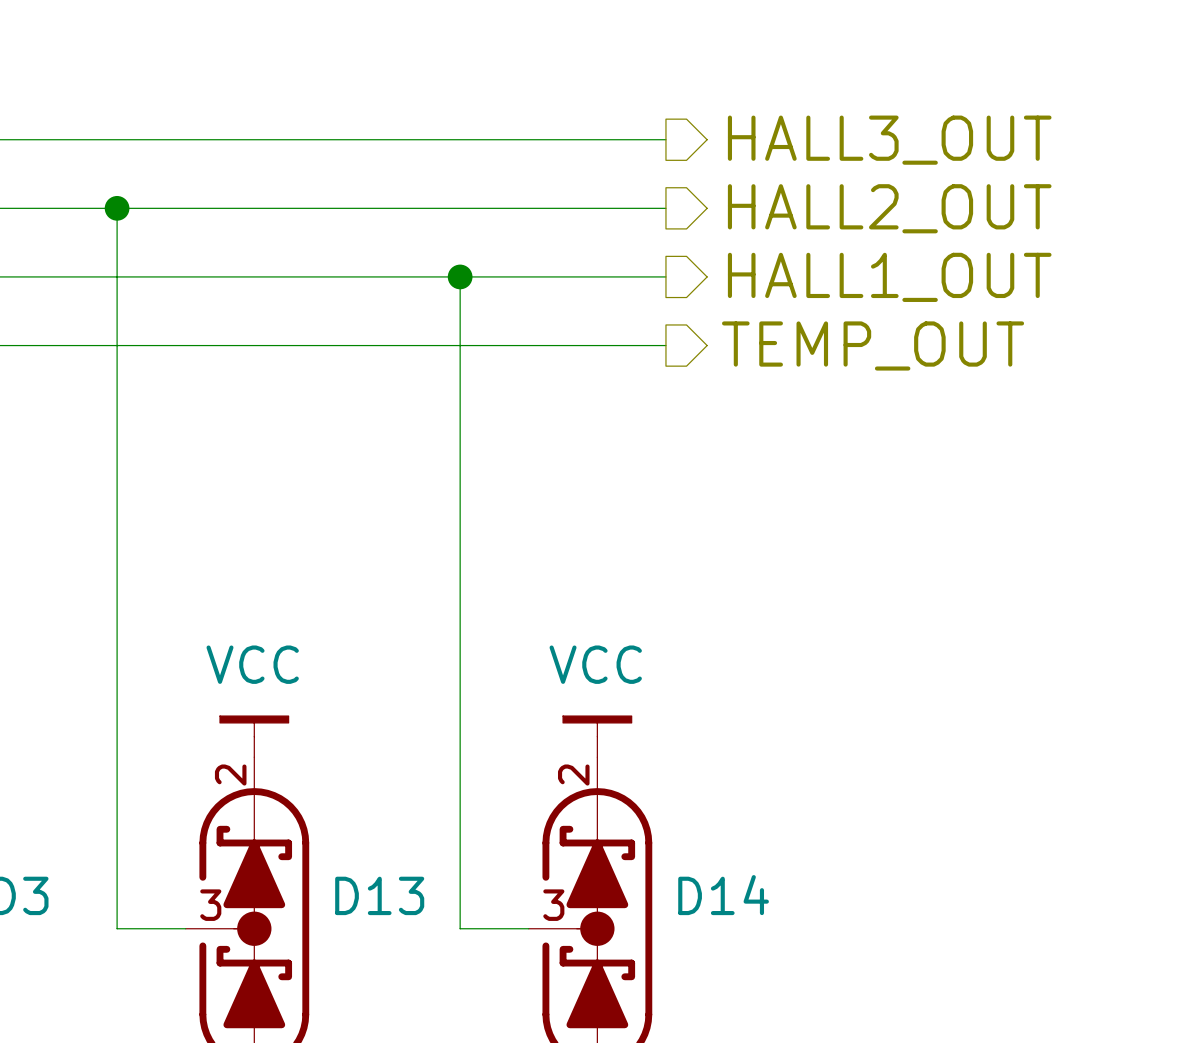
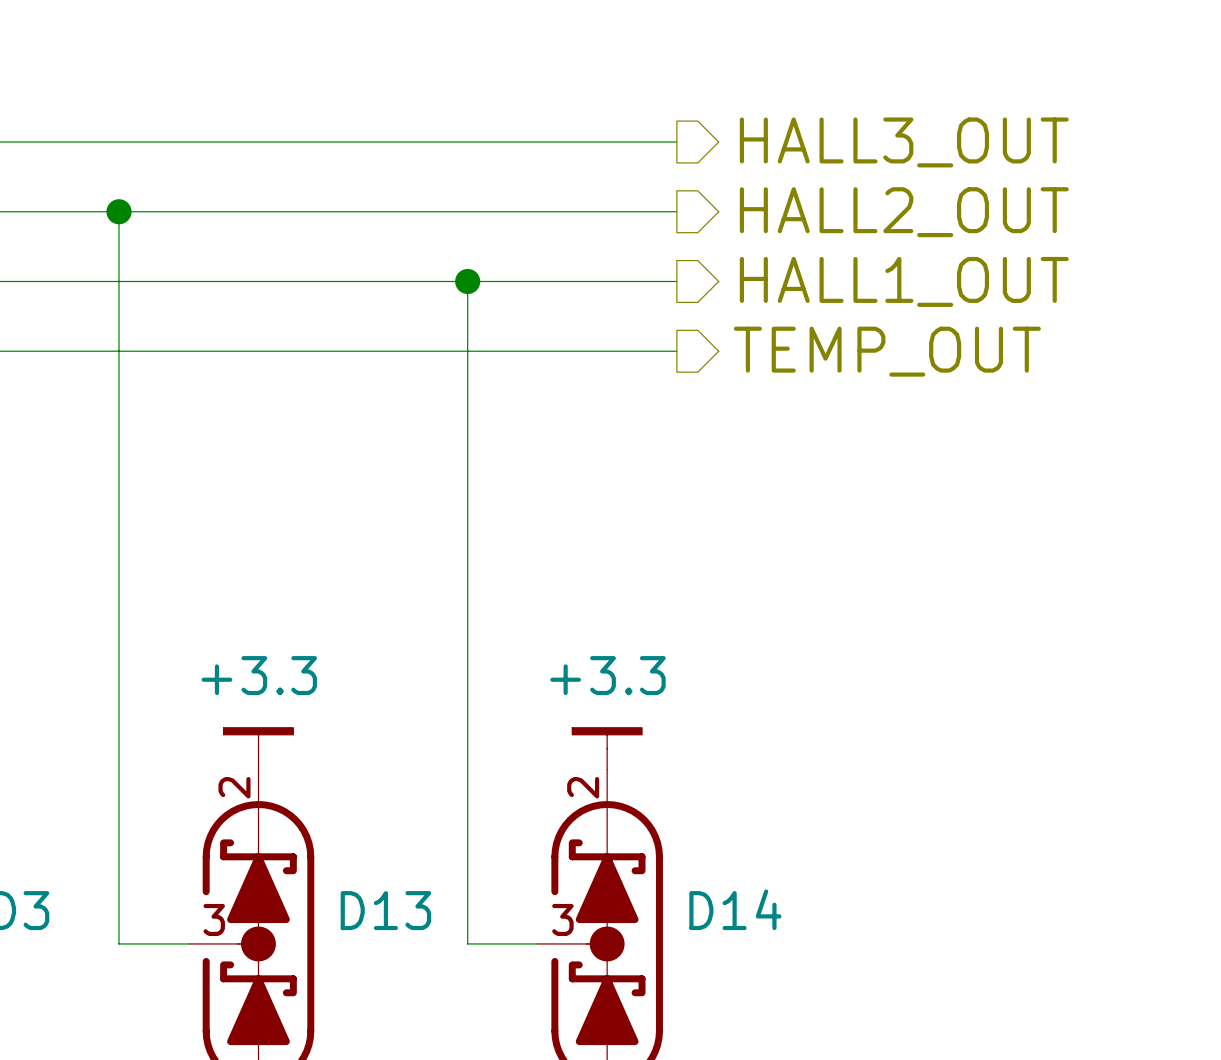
power symbol: VCC (254, 736) -> +3.3 (258, 748)
power symbol: VCC (597, 736) -> +3.3 (607, 748)

